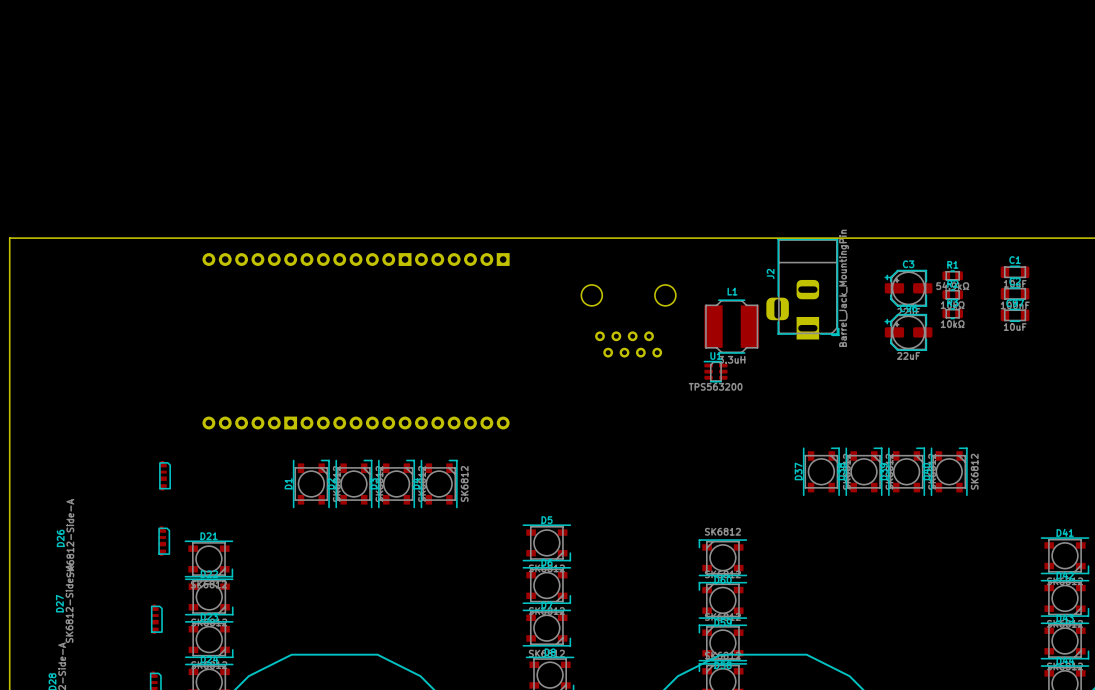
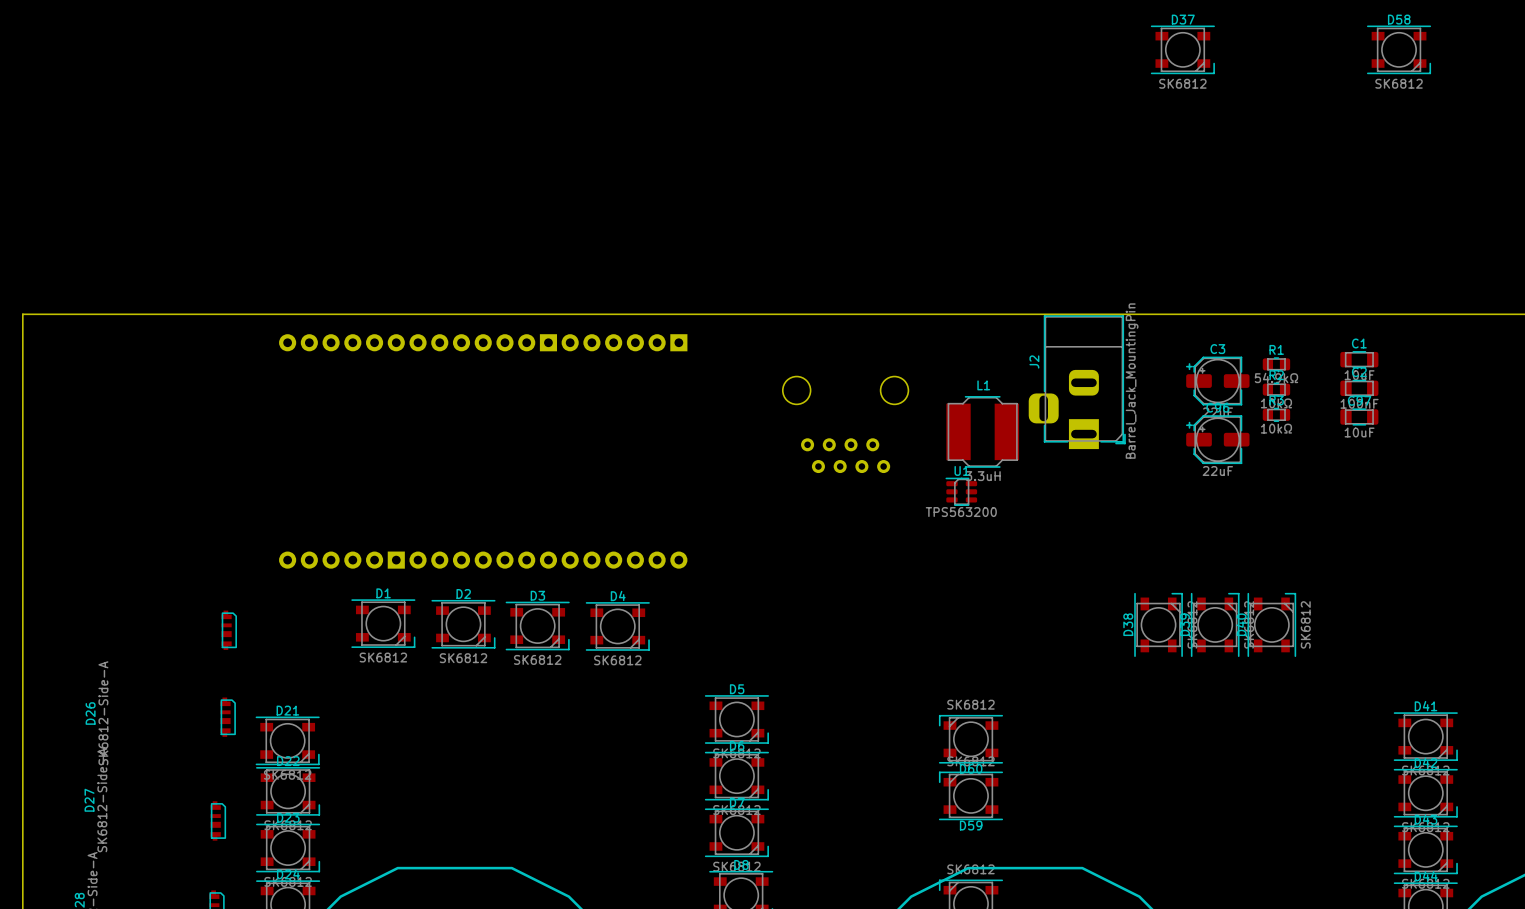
D37 rotation: 0° (821, 471) -> 90° clockwise (1182, 49)
D37 position: (821, 471) -> (1182, 49)
D1 rotation: 0° (311, 484) -> 90° clockwise (383, 623)
D1 position: (311, 484) -> (383, 623)
D2 rotation: 0° (353, 484) -> 90° clockwise (463, 624)
D3 rotation: 0° (396, 484) -> 90° clockwise (537, 626)
D4 rotation: 0° (439, 484) -> 90° clockwise (617, 626)
D58 rotation: 0° (722, 642) -> 180° (1399, 49)
D58 position: (722, 642) -> (1399, 49)

